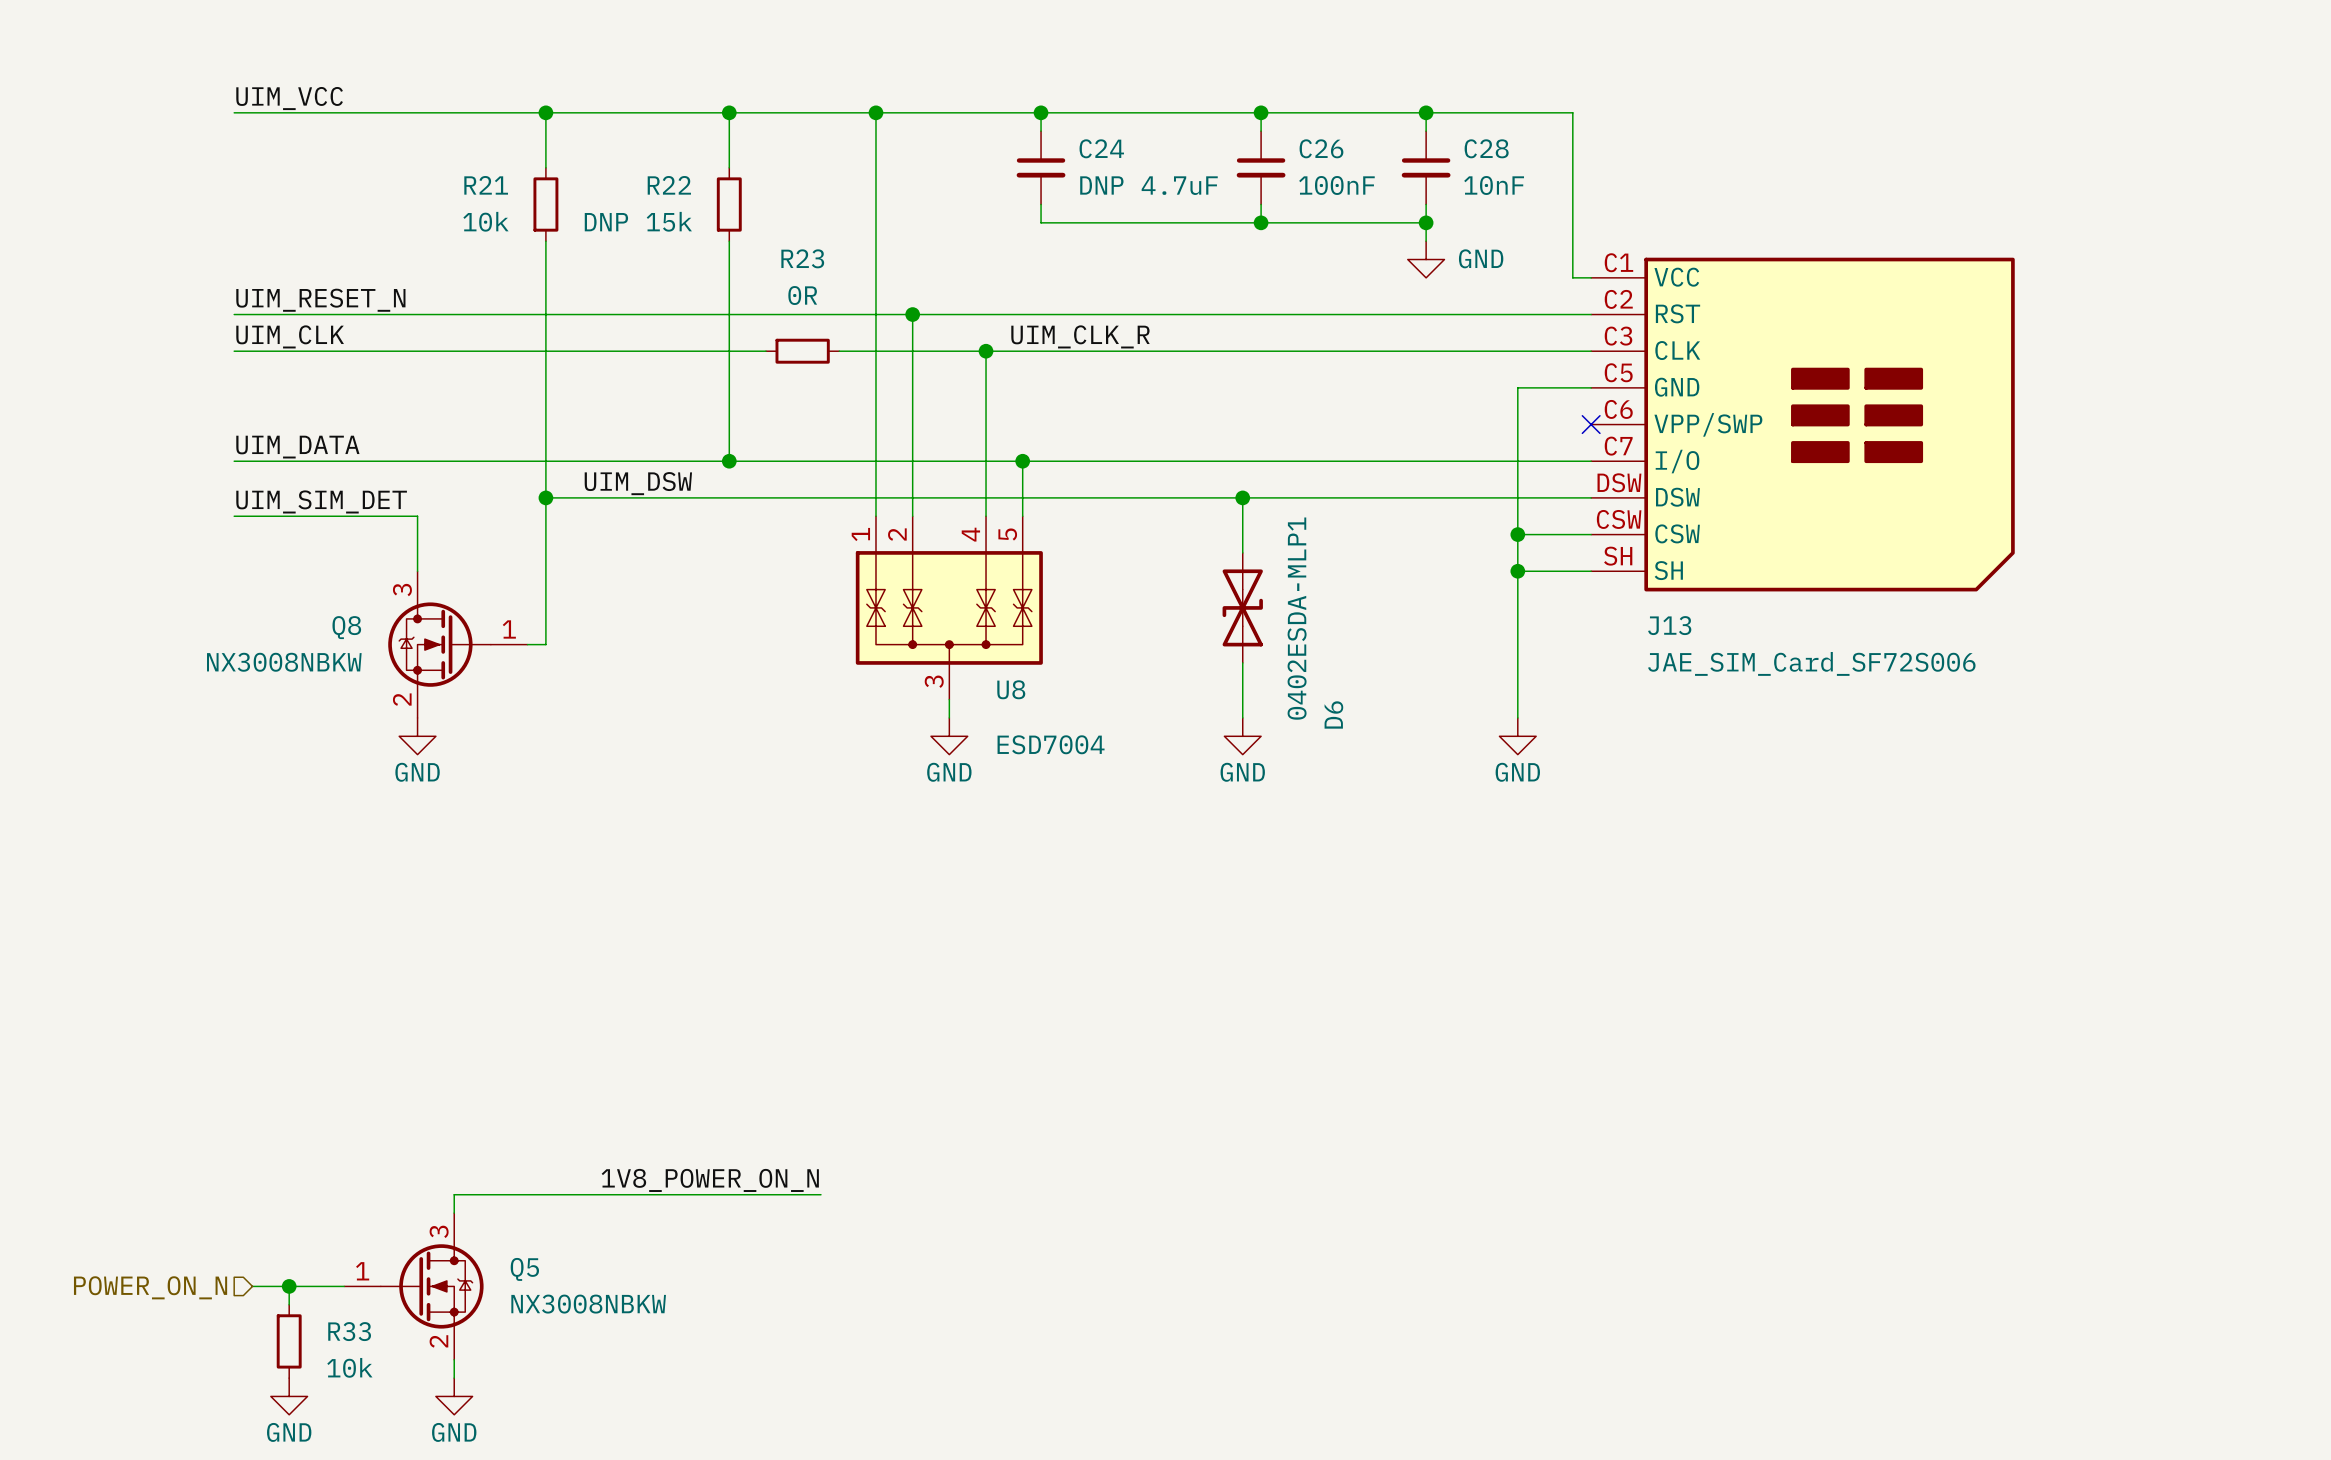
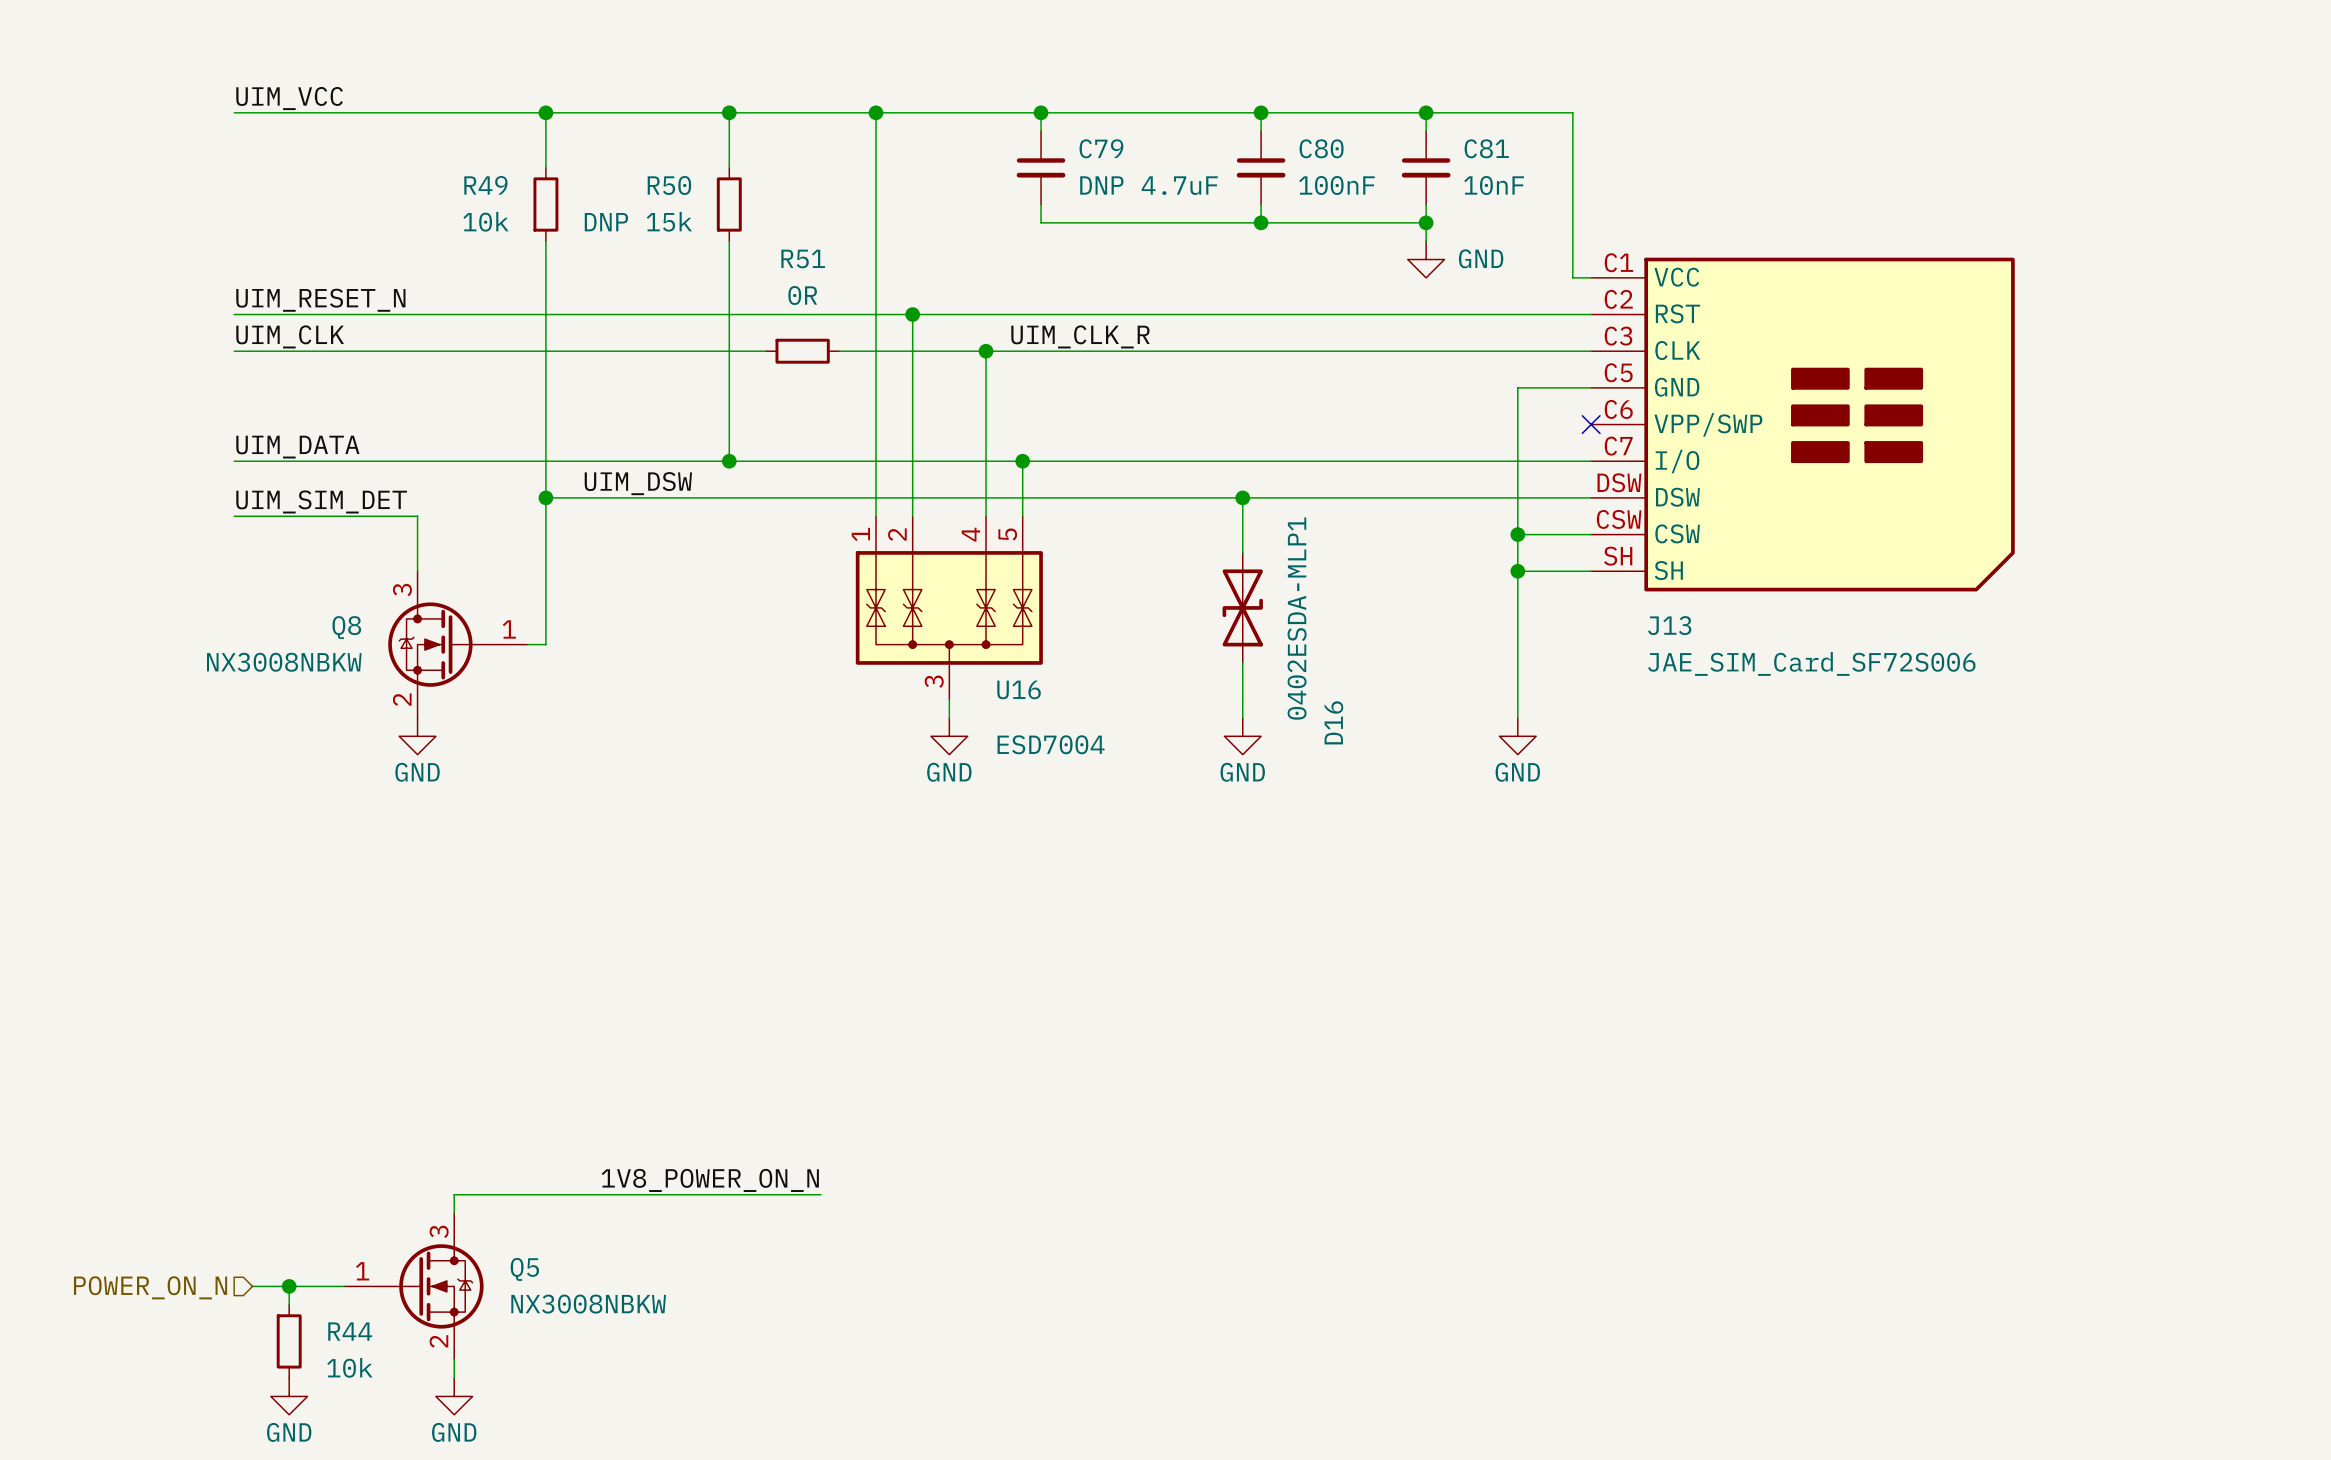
C24 name: C24 (1101, 148) -> C79 (1101, 148)
C26 name: C26 (1321, 148) -> C80 (1321, 148)
C28 name: C28 (1486, 148) -> C81 (1486, 148)
R21 name: R21 (486, 185) -> R49 (485, 185)
R22 name: R22 (669, 185) -> R50 (669, 185)
R23 name: R23 (802, 258) -> R51 (803, 258)
U8 name: U8 (1011, 689) -> U16 (1019, 689)
D6 name: D6 (1333, 714) -> D16 (1333, 722)
R33 name: R33 (349, 1331) -> R44 (350, 1331)

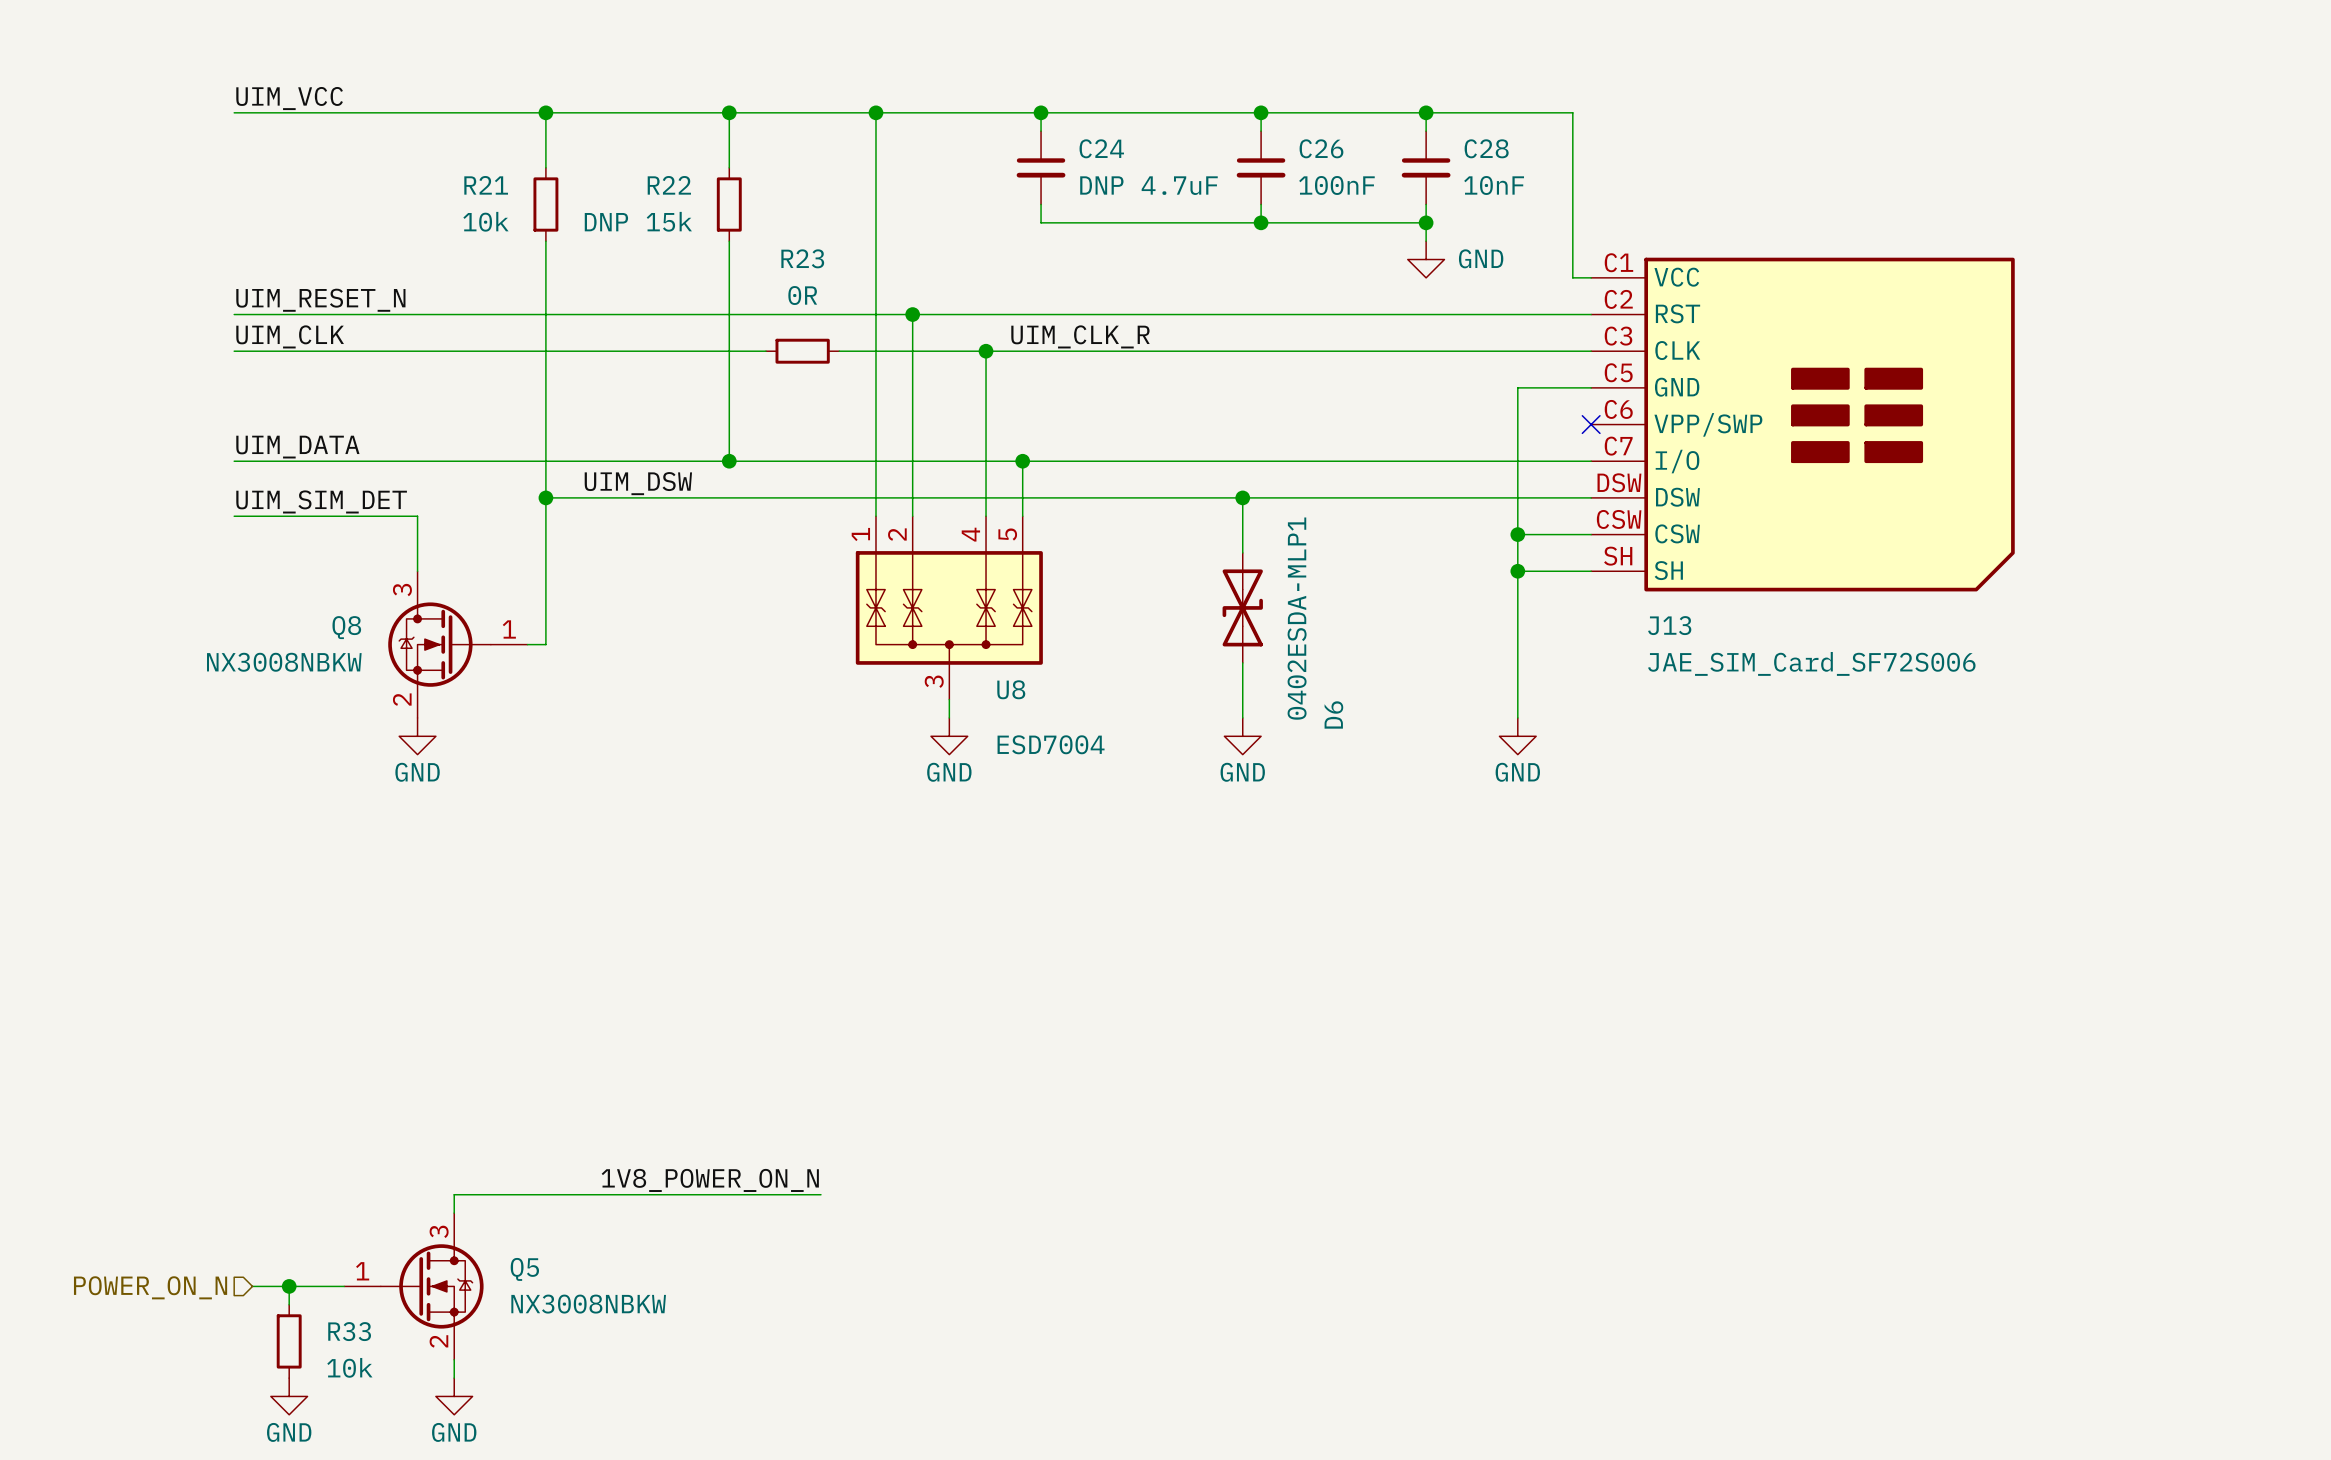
C79 name: C79 (1101, 148) -> C24 (1101, 148)
C80 name: C80 (1321, 148) -> C26 (1321, 148)
C81 name: C81 (1486, 148) -> C28 (1486, 148)
R49 name: R49 (485, 185) -> R21 (486, 185)
R50 name: R50 (669, 185) -> R22 (669, 185)
R51 name: R51 (803, 258) -> R23 (802, 258)
U16 name: U16 (1019, 689) -> U8 (1011, 689)
D16 name: D16 (1333, 722) -> D6 (1333, 714)
R44 name: R44 (350, 1331) -> R33 (349, 1331)

